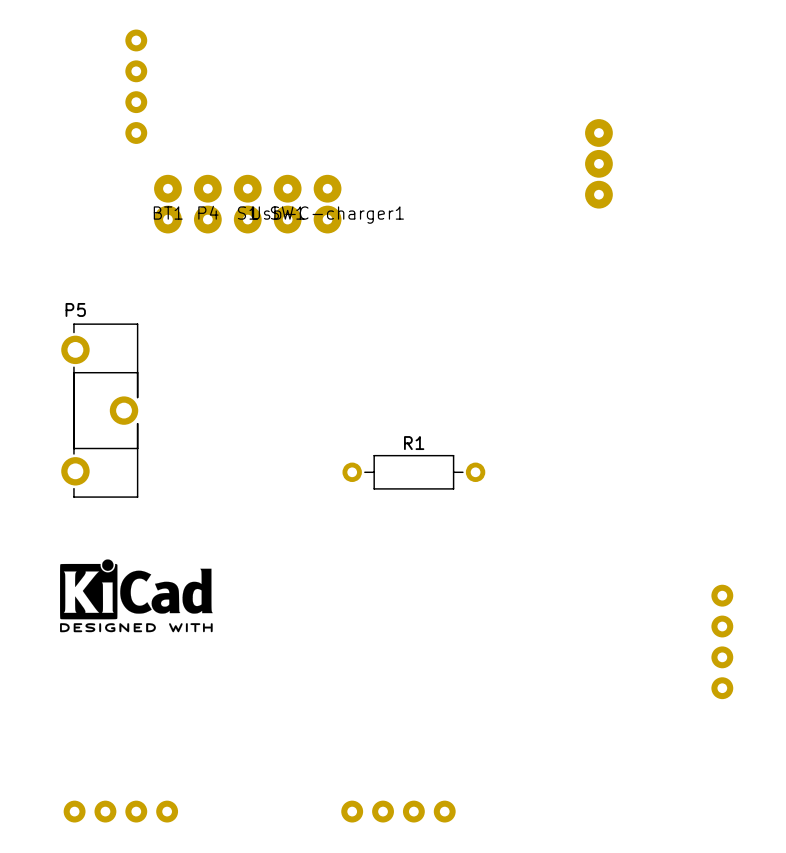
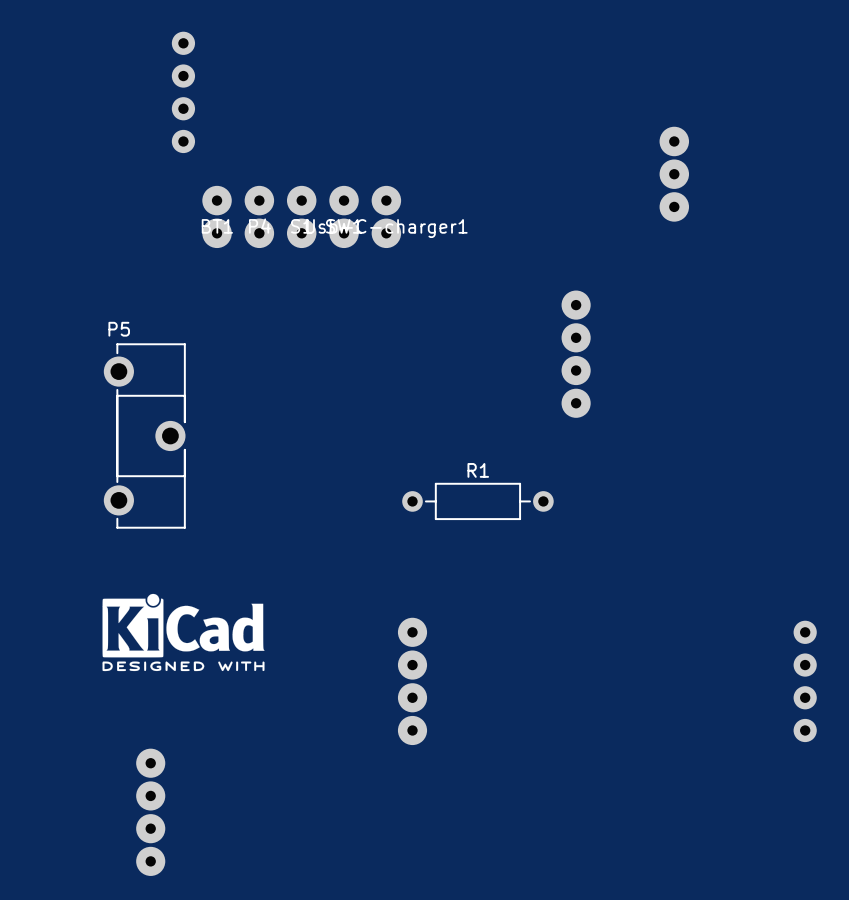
part: none -> (576, 354)
part: none -> (412, 681)
part: none -> (150, 812)
part: (120, 811) -> none
part: (398, 811) -> none

